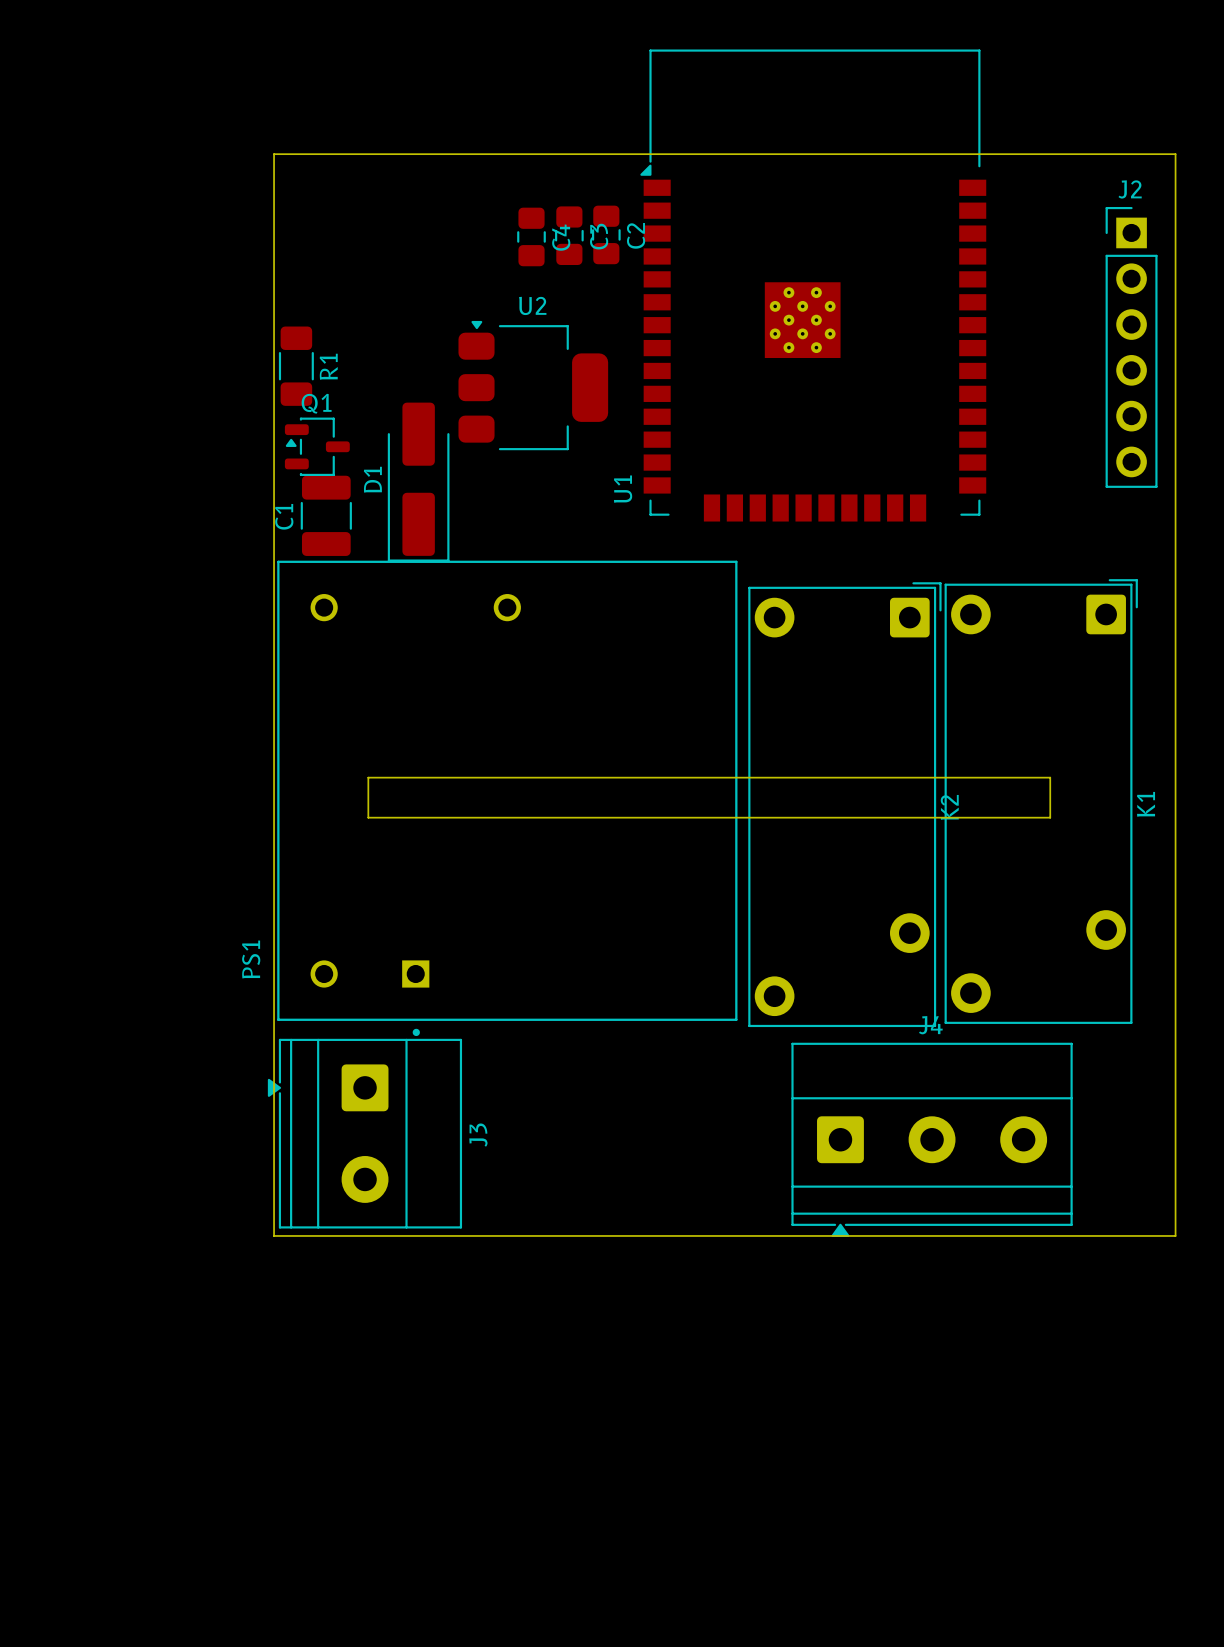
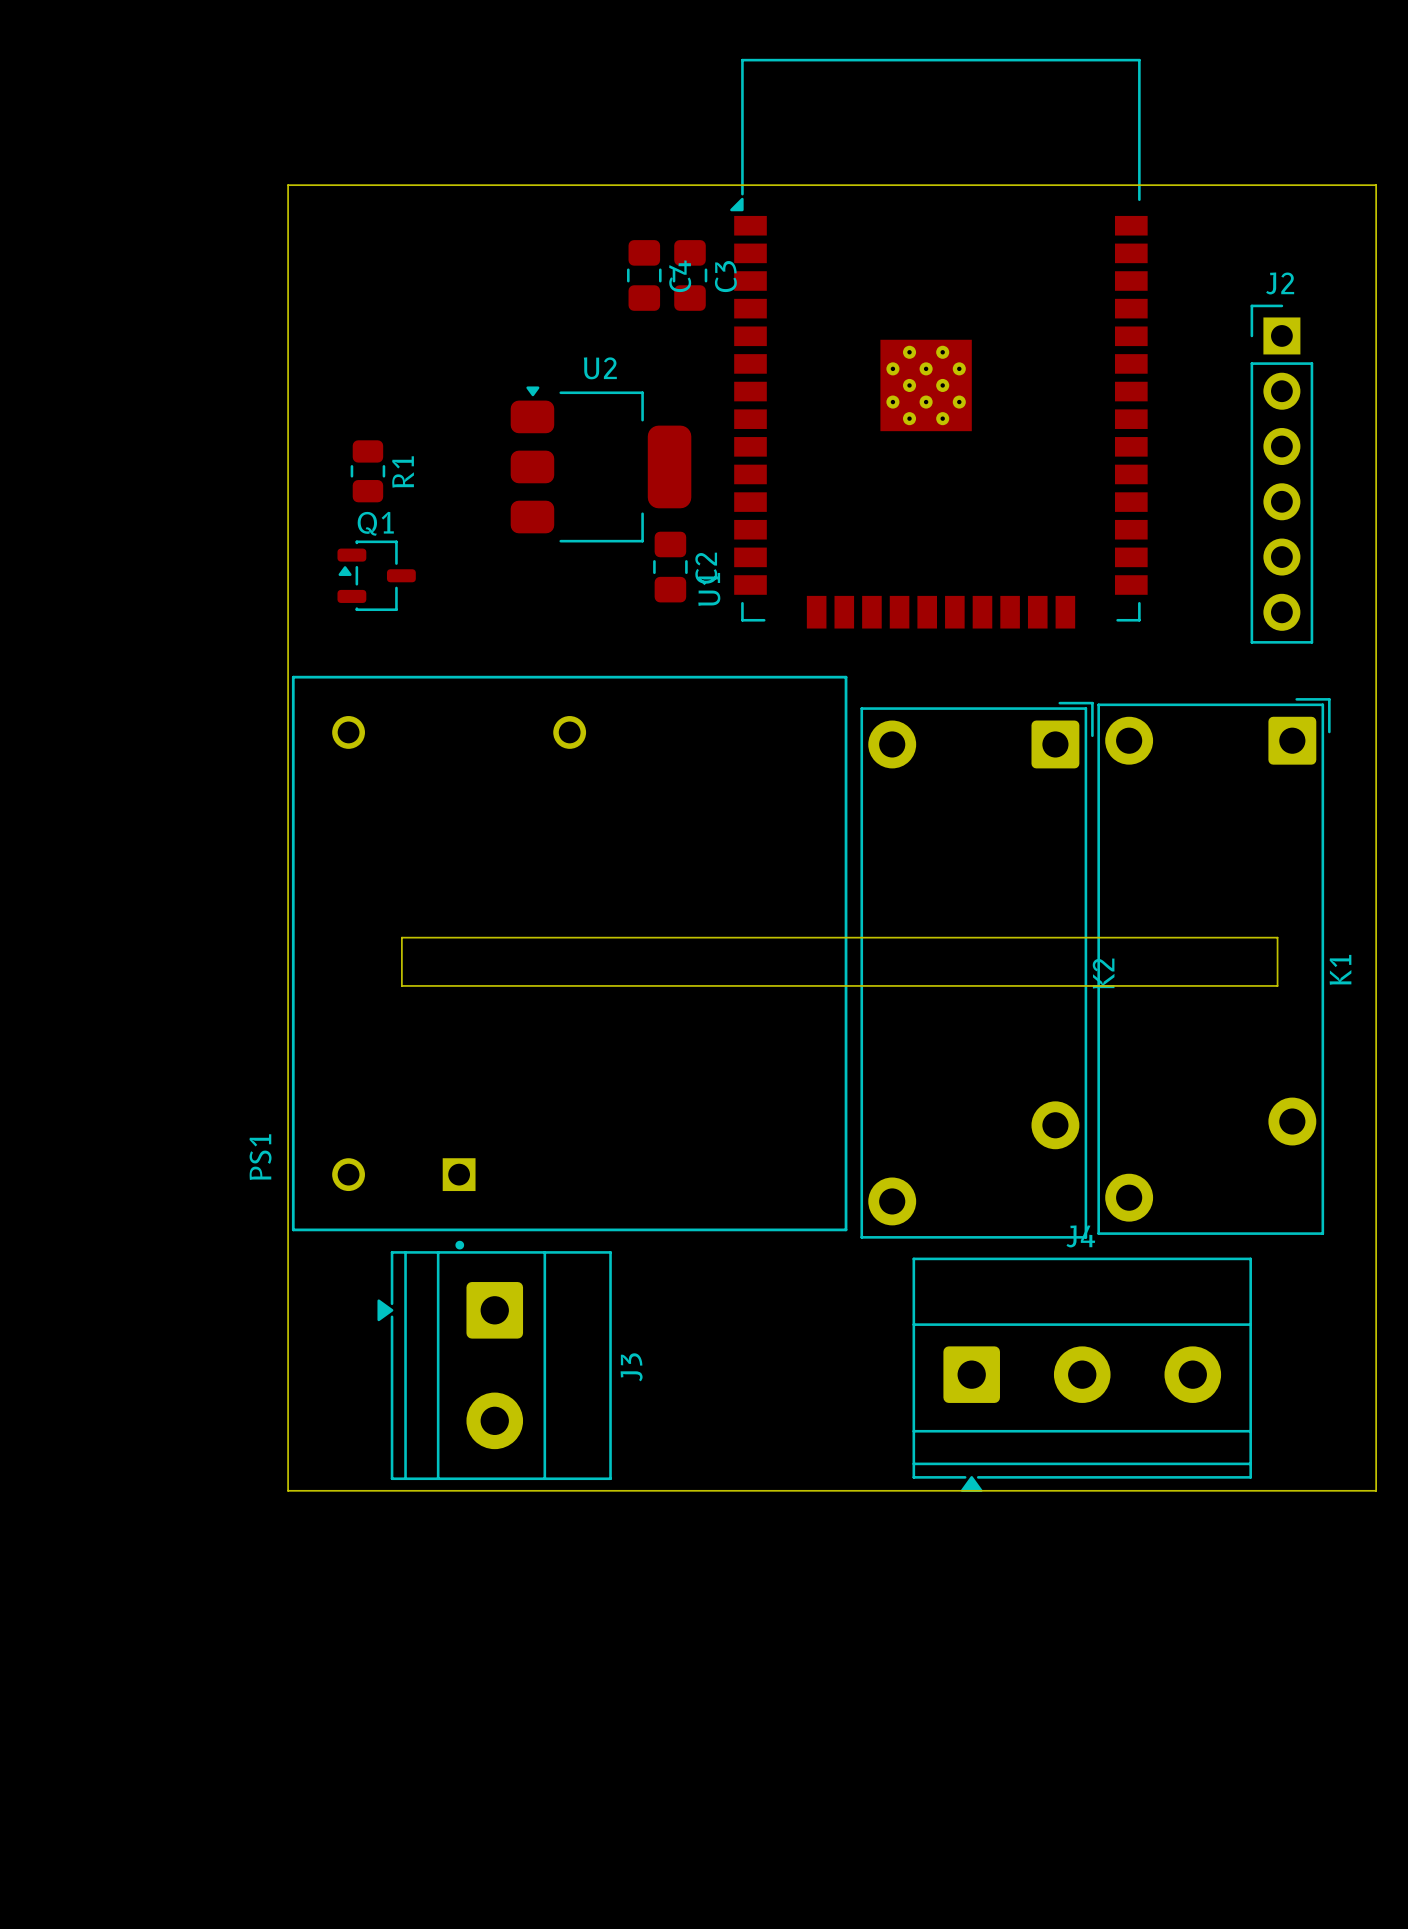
C2 position: (606, 234) -> (670, 567)
C3 position: (569, 235) -> (690, 275)
C4 position: (531, 236) -> (644, 275)
R1 footprint: [278, 326, 314, 406] -> [350, 440, 386, 503]
J2 position: (1131, 347) -> (1281, 474)
Q1 position: (317, 446) -> (376, 575)
D1: (418, 482) -> none
C1: (326, 515) -> none
board edge: (1050, 777) (1050, 817) -> (1224, 937) (1277, 937) (1277, 985) (1224, 985)
J3 position: (364, 1133) -> (494, 1365)

